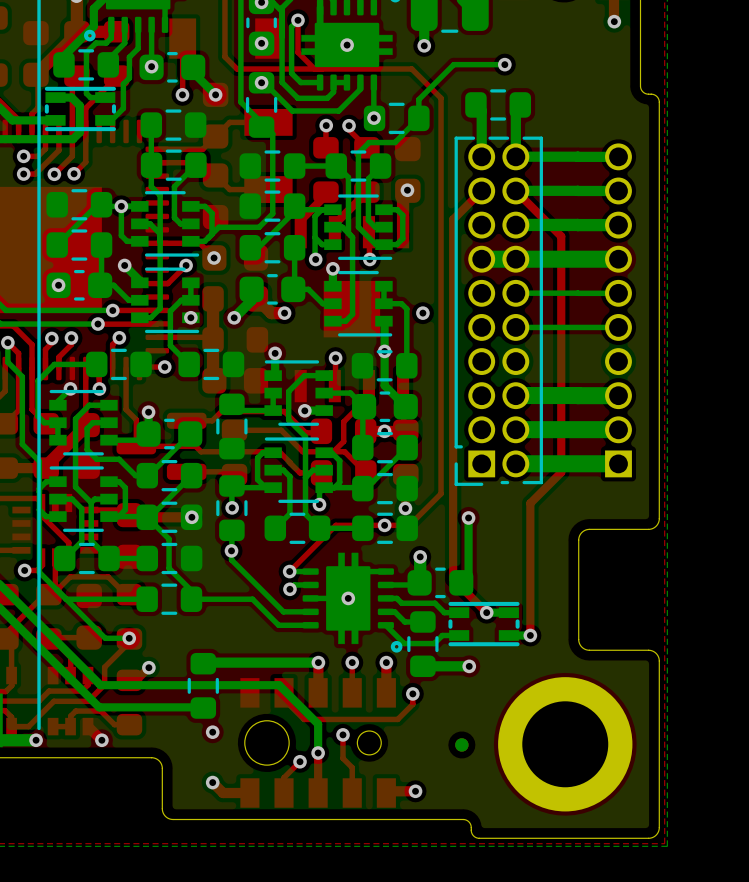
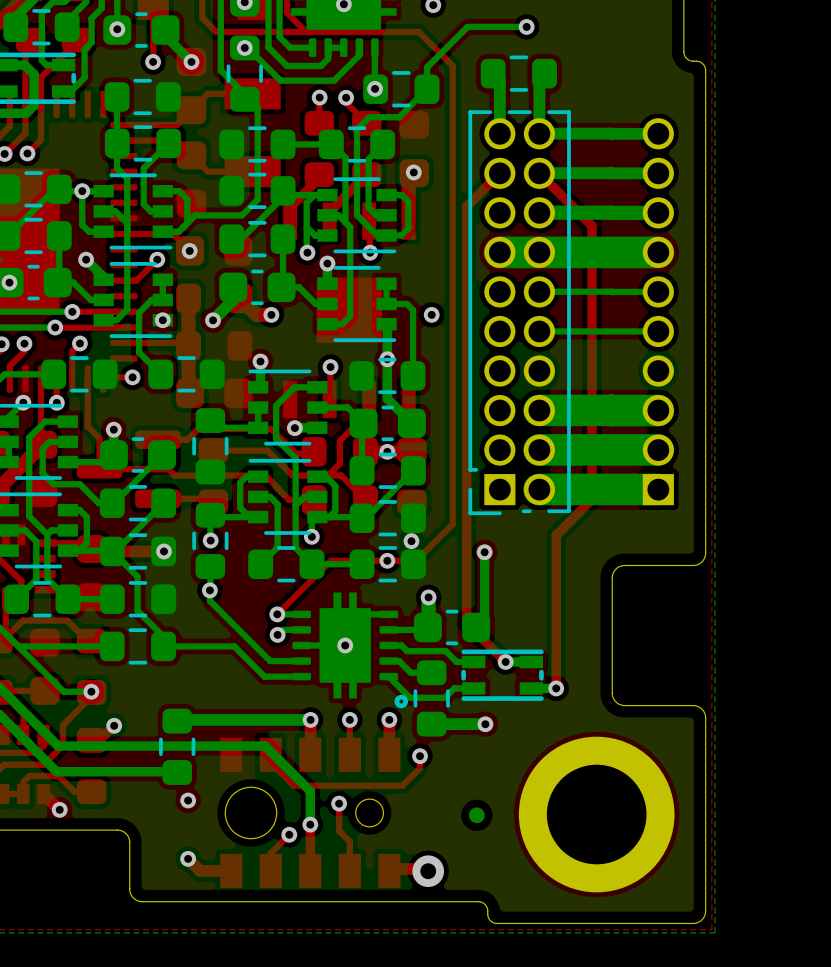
bottom track width: thin (618, 259) (481, 259) -> thick (658, 252) (499, 252)
bottom track width: thin (618, 429) (515, 429) -> thick (658, 449) (539, 449)
bottom track width: thin (618, 463) (515, 463) -> thick (658, 489) (539, 489)
via size: [408, 784, 423, 799] -> [412, 855, 445, 888]

